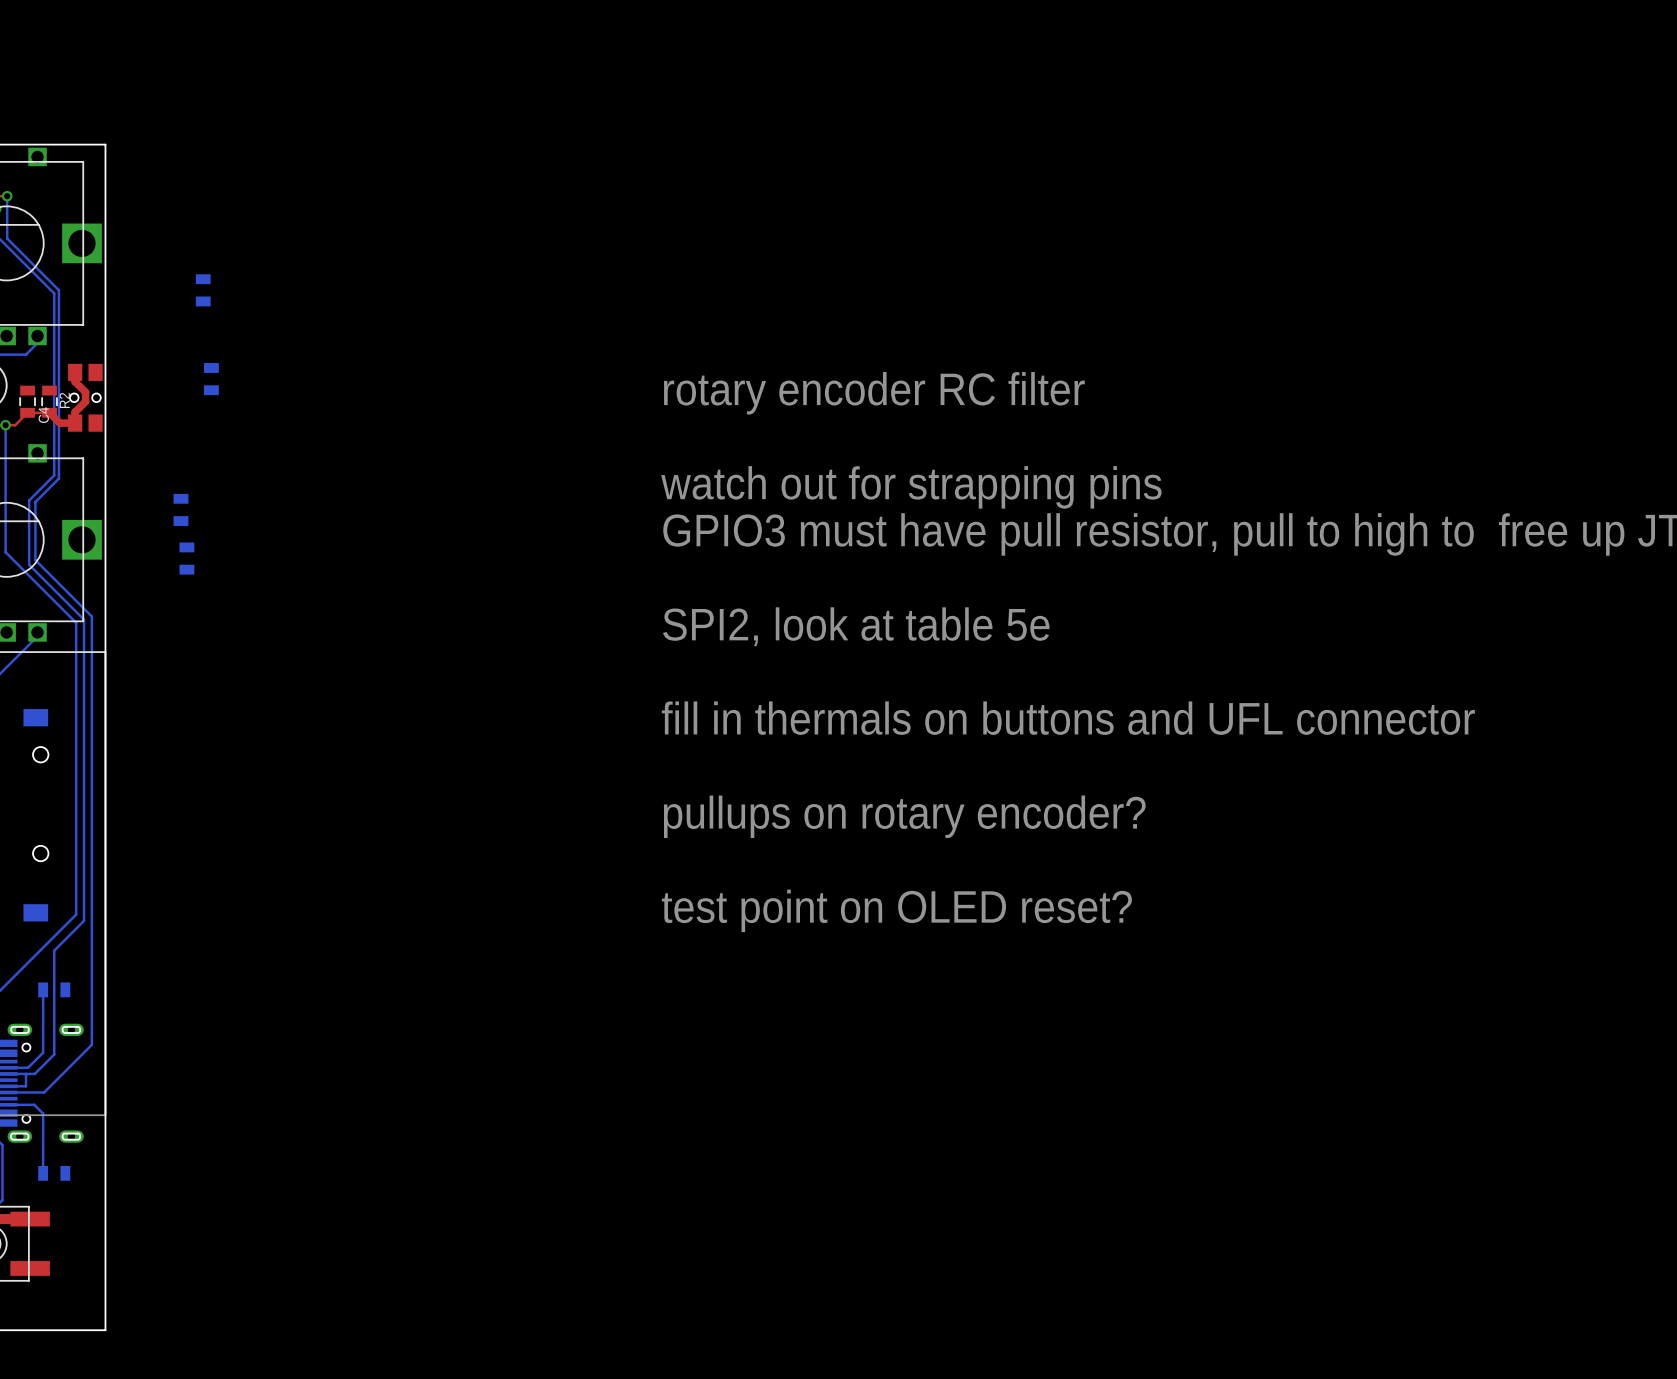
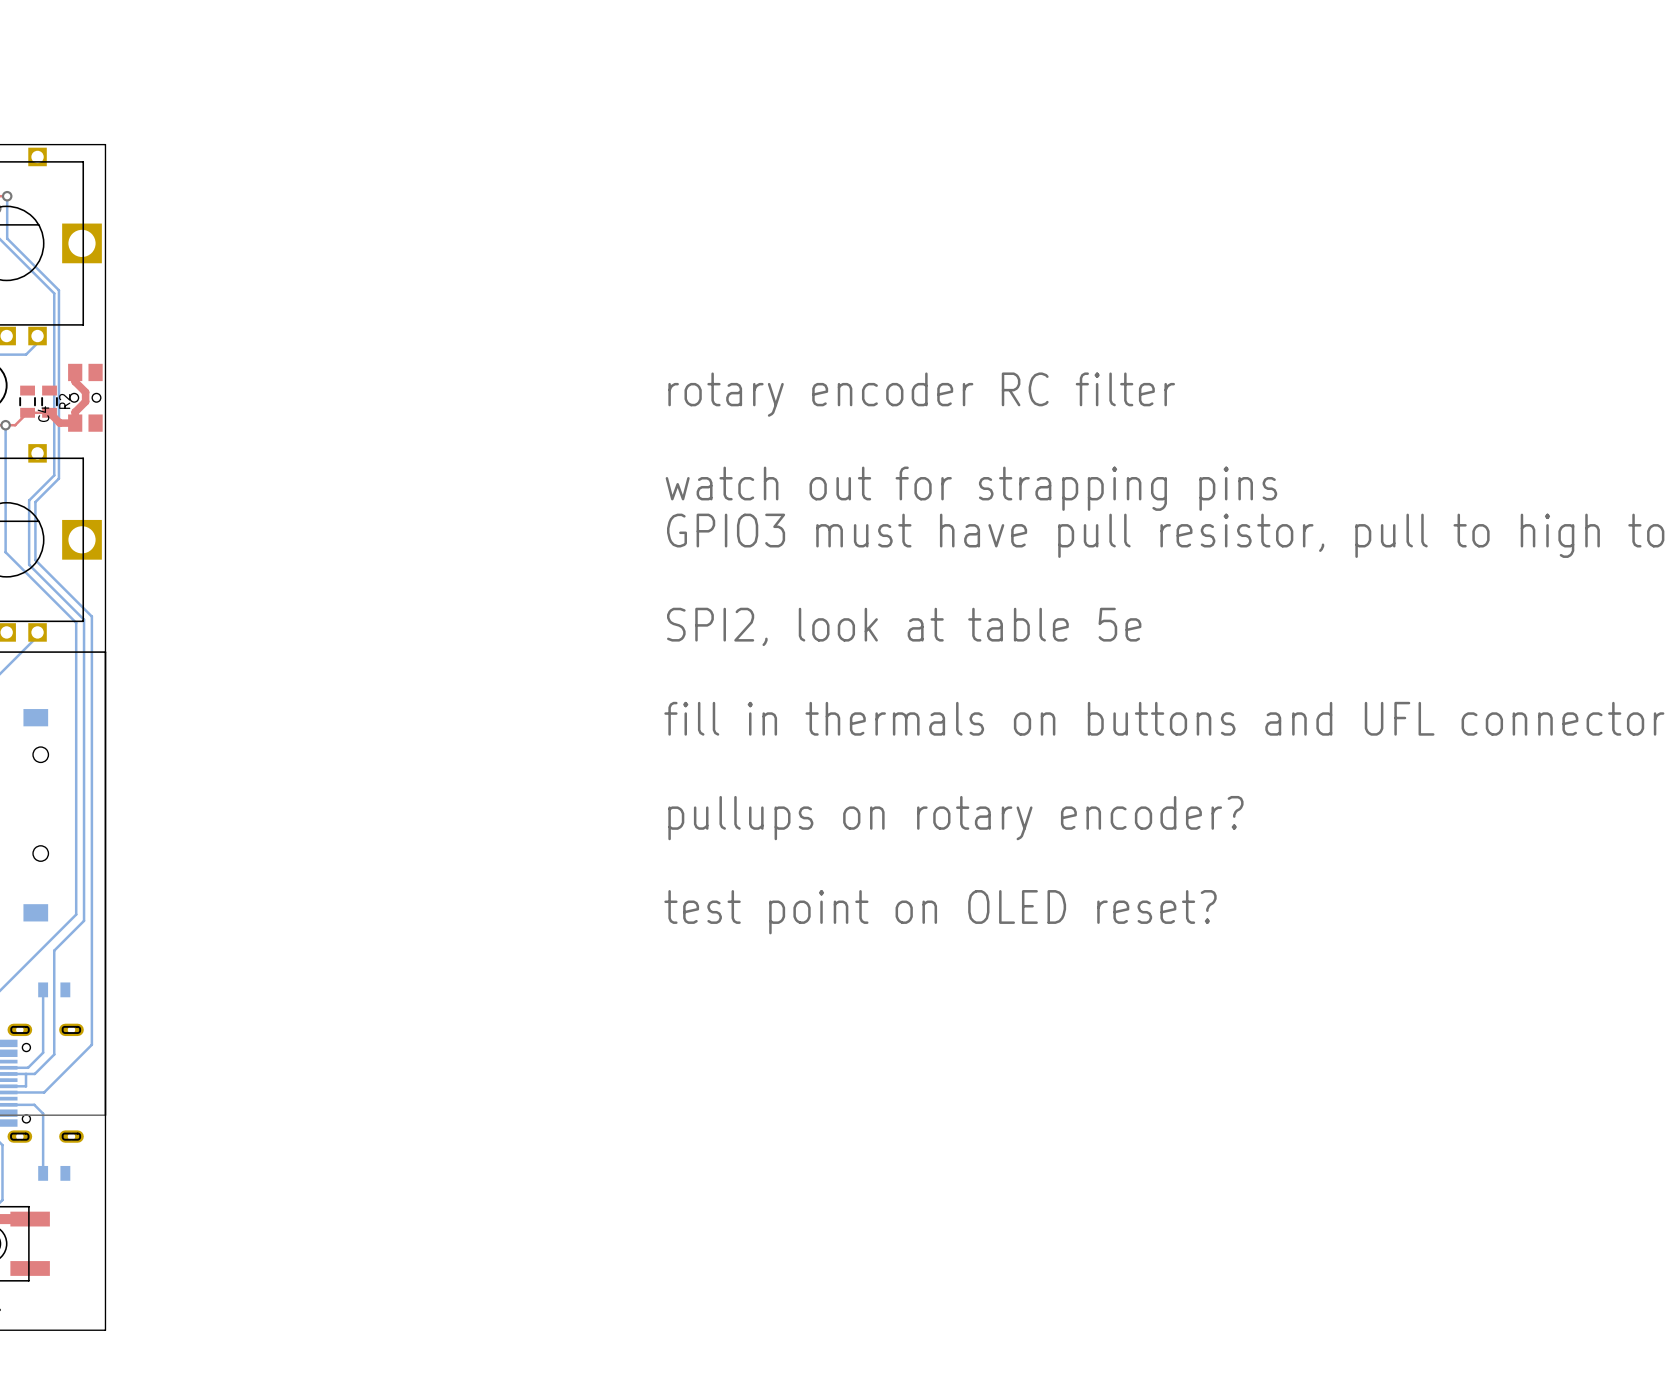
part: (203, 290) -> none
part: (211, 379) -> none
part: (180, 509) -> none
part: (186, 558) -> none

